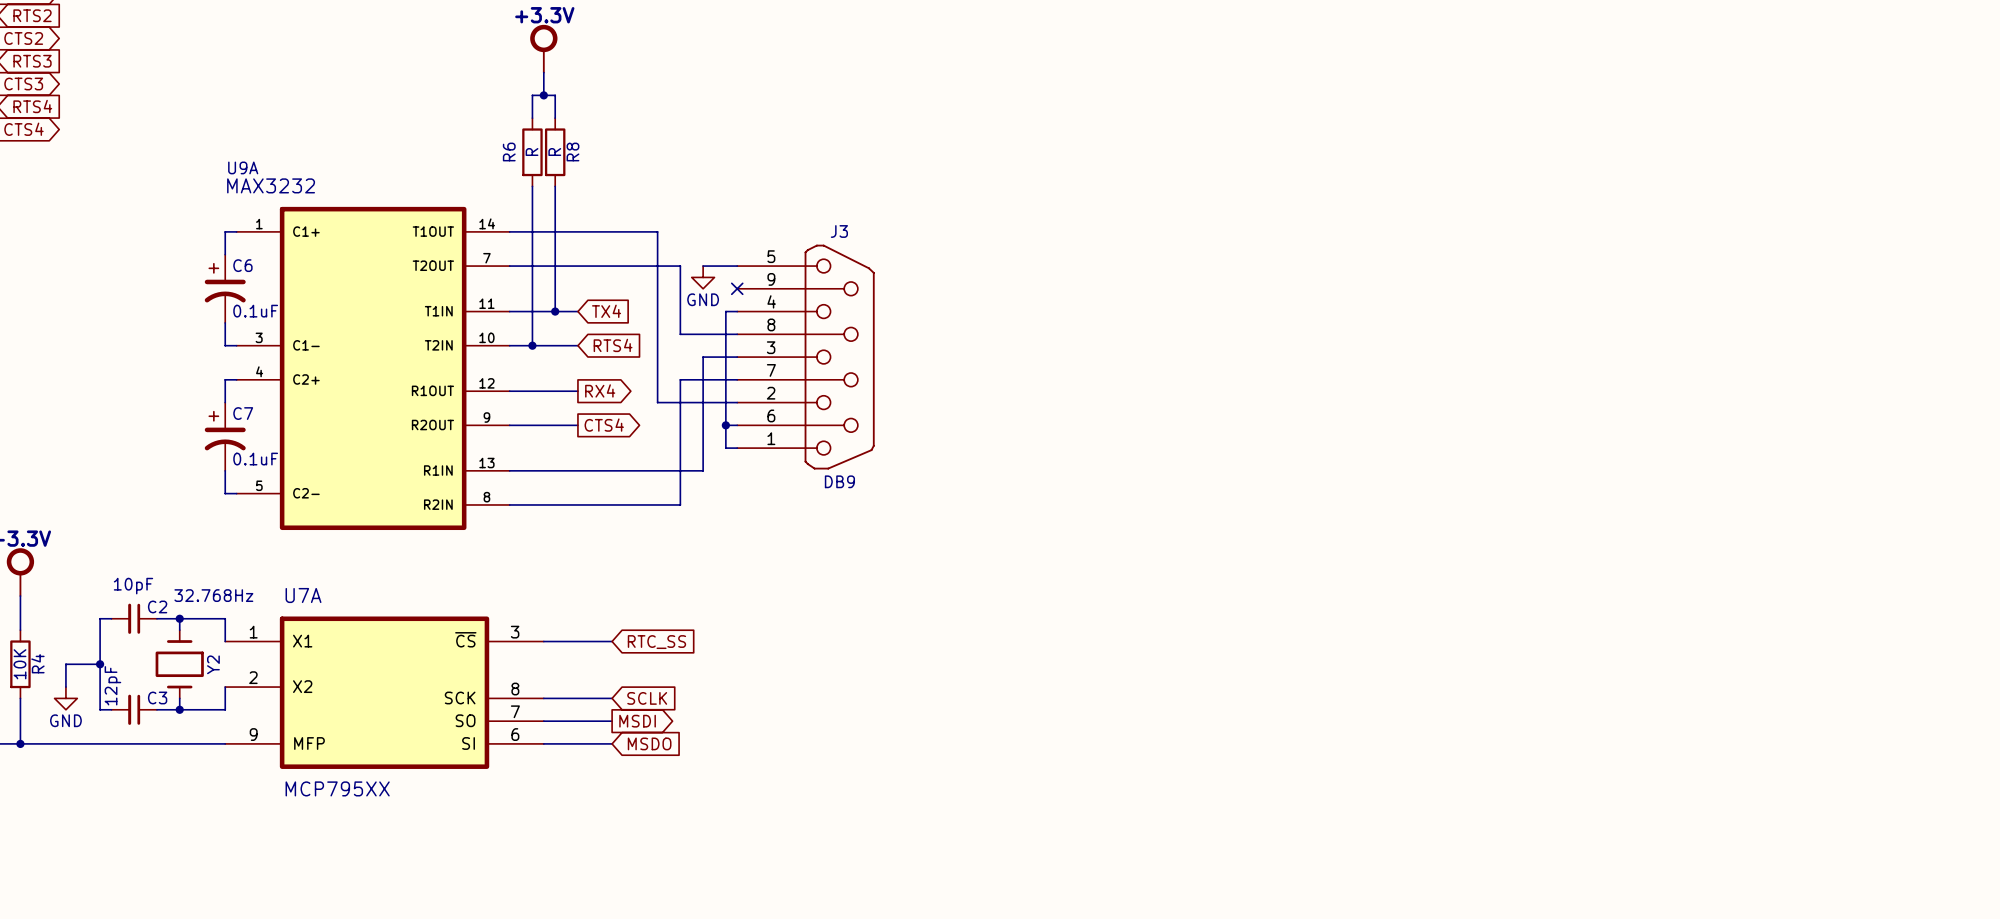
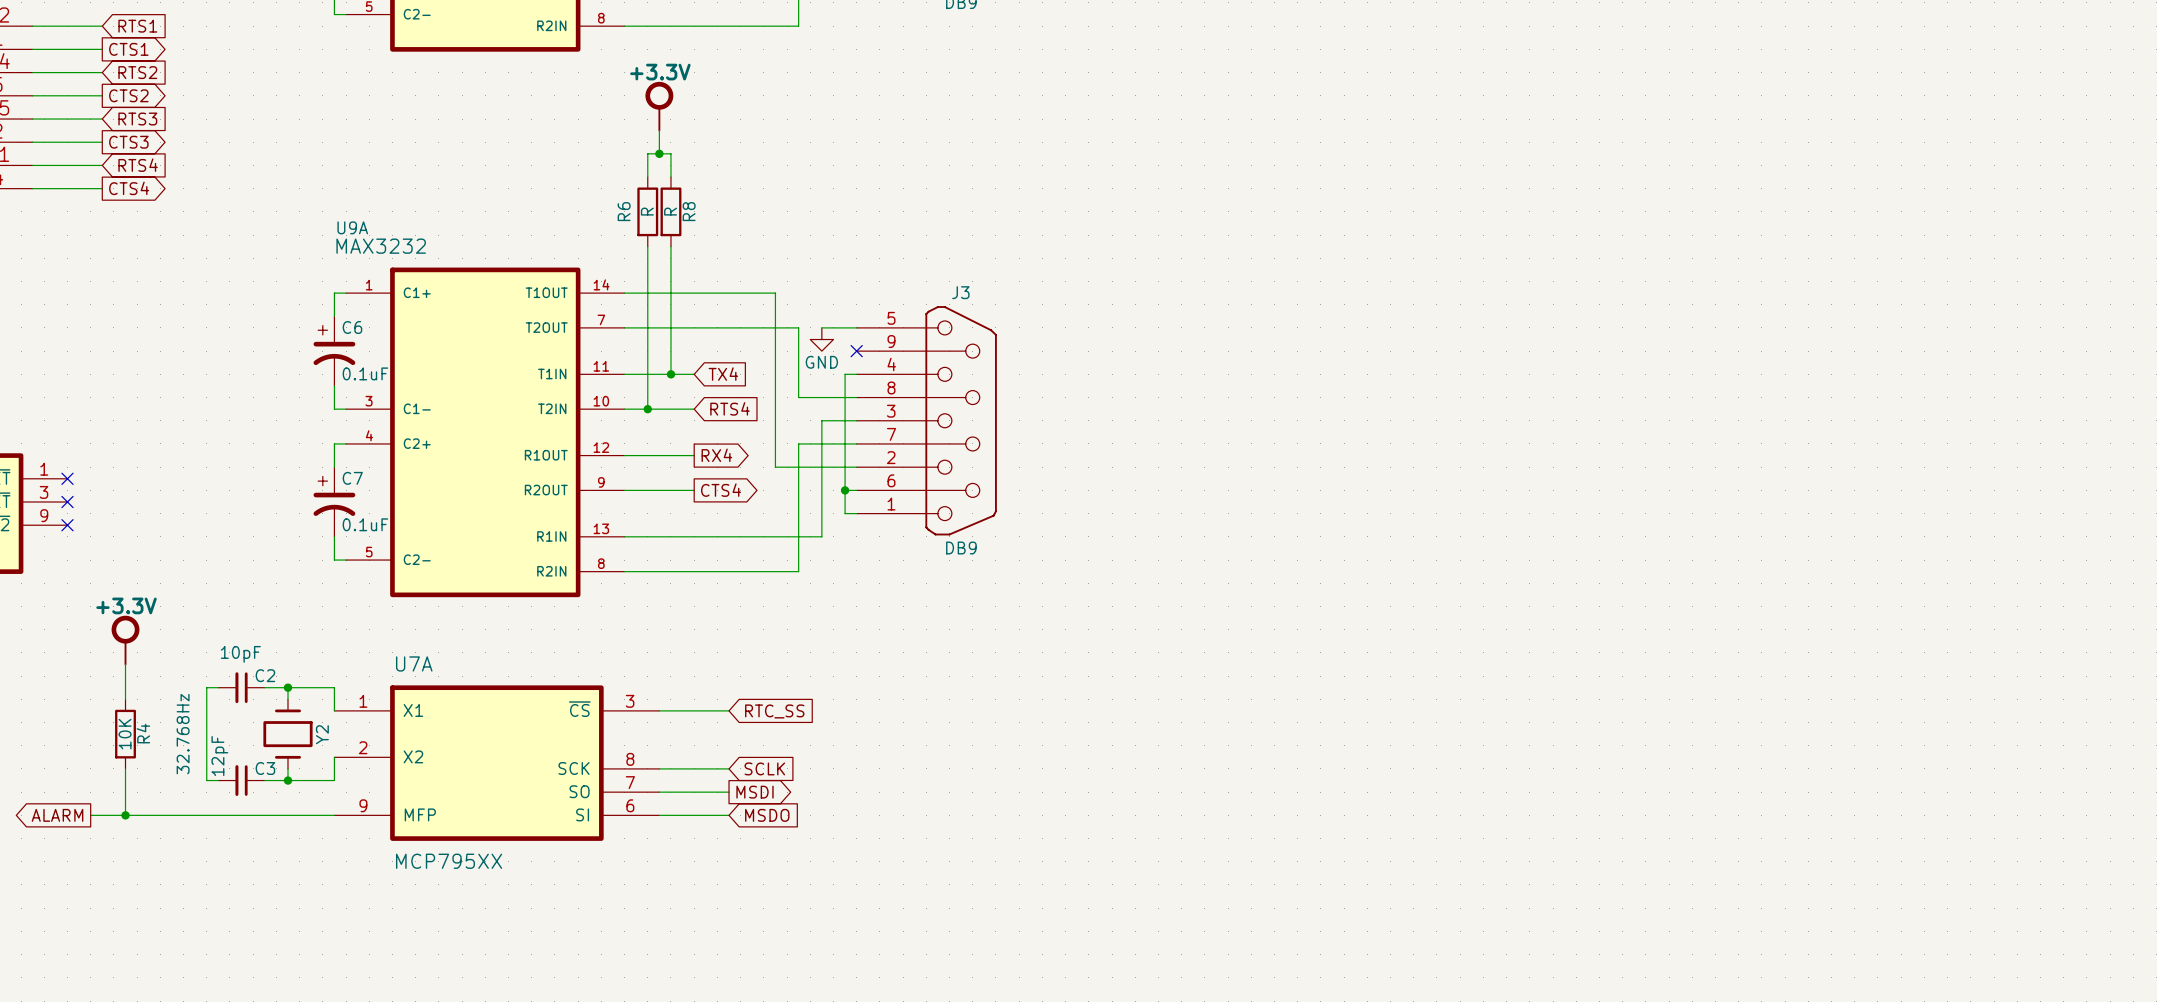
Y2 value rotation: 0° (213, 595) -> 90° counterclockwise (183, 734)
Y2 value position: 32.768Hz (213, 595) -> 32.768Hz (183, 734)
wire: (100, 664) (65, 664) (65, 687) -> none
junction: (100, 664) -> none
power symbol: GND (65, 698) -> none

